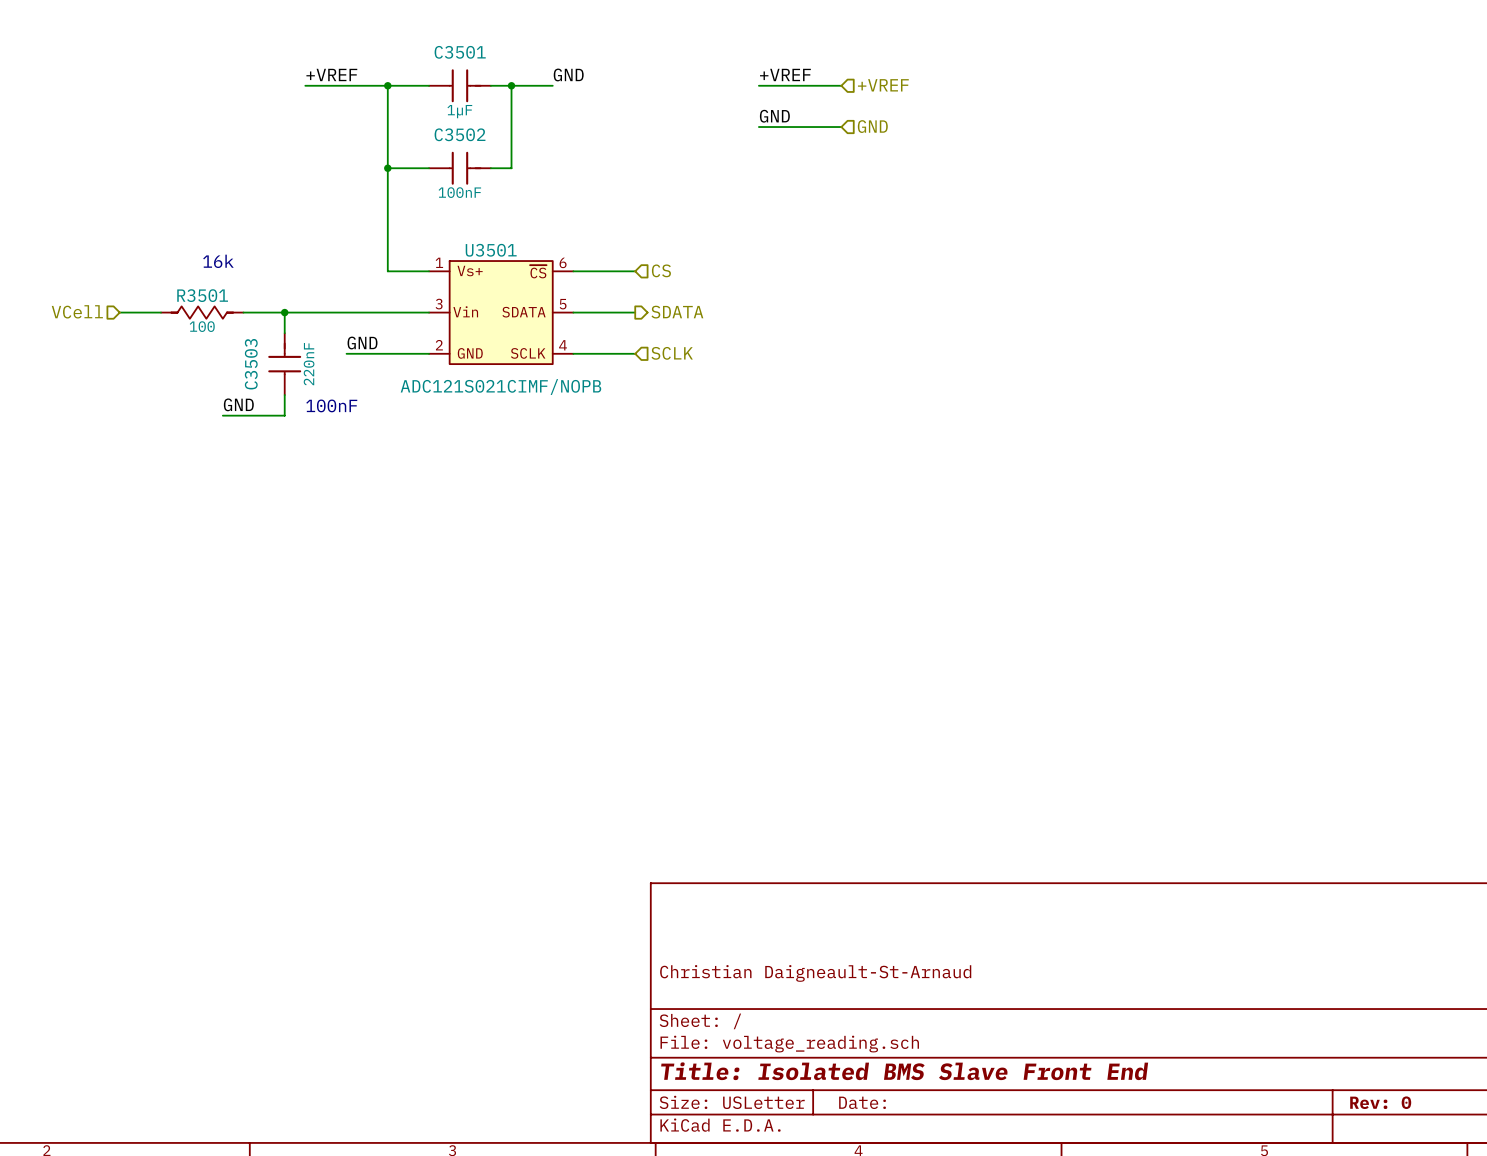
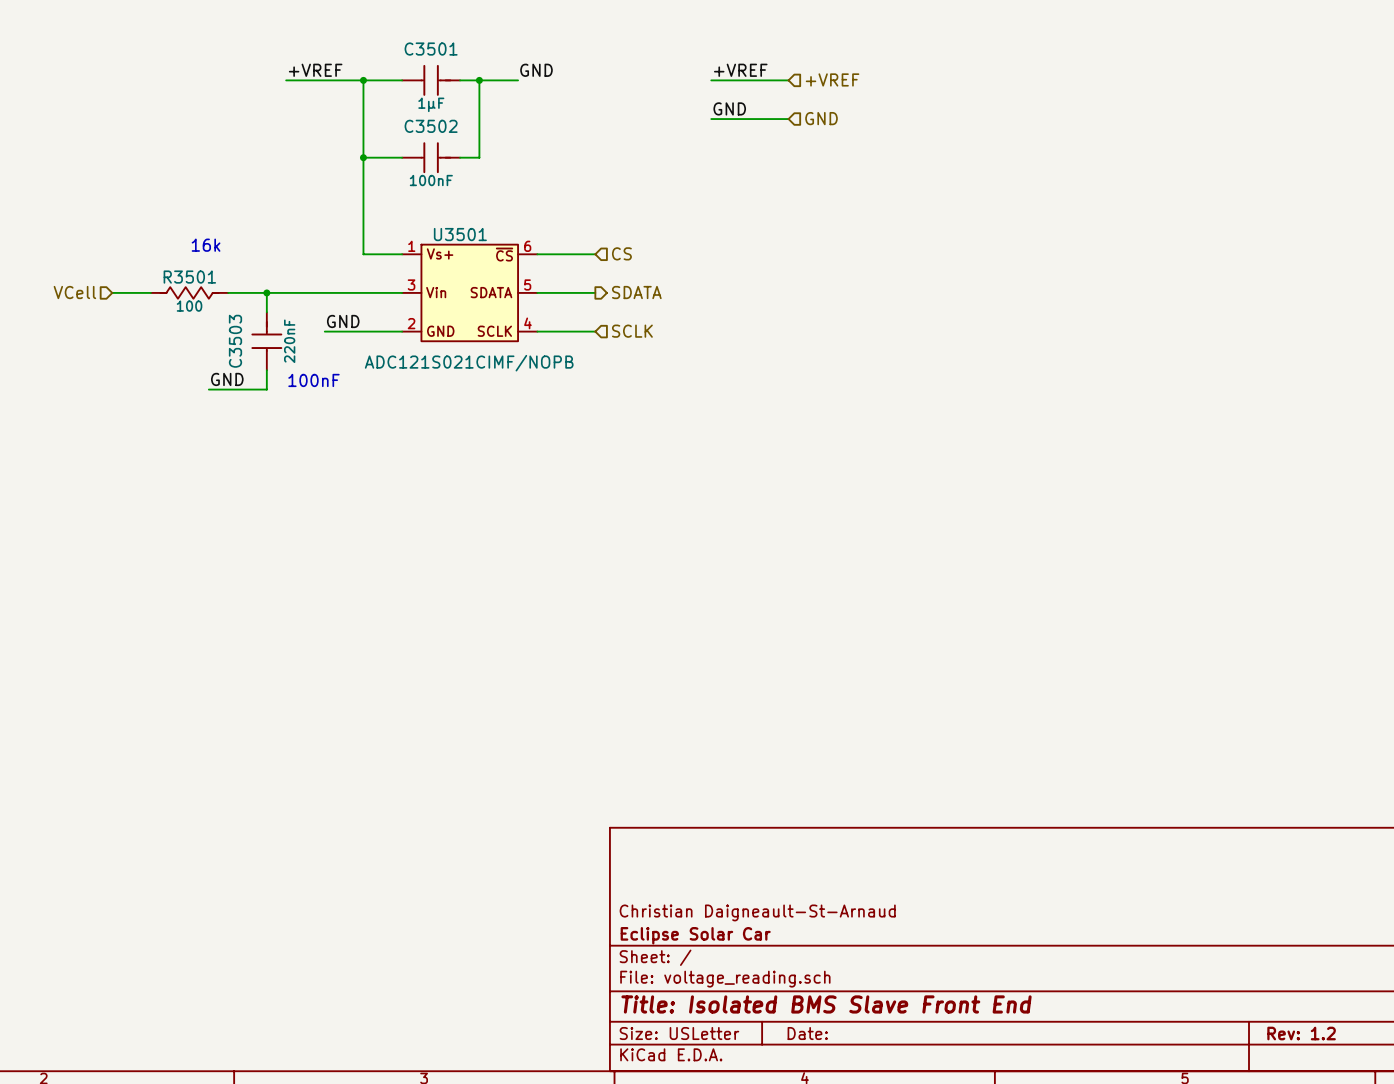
title block: none -> Eclipse Solar Car (695, 935)
title block: Rev: 0 (1380, 1102) -> Rev: 1.2 (1301, 1033)

